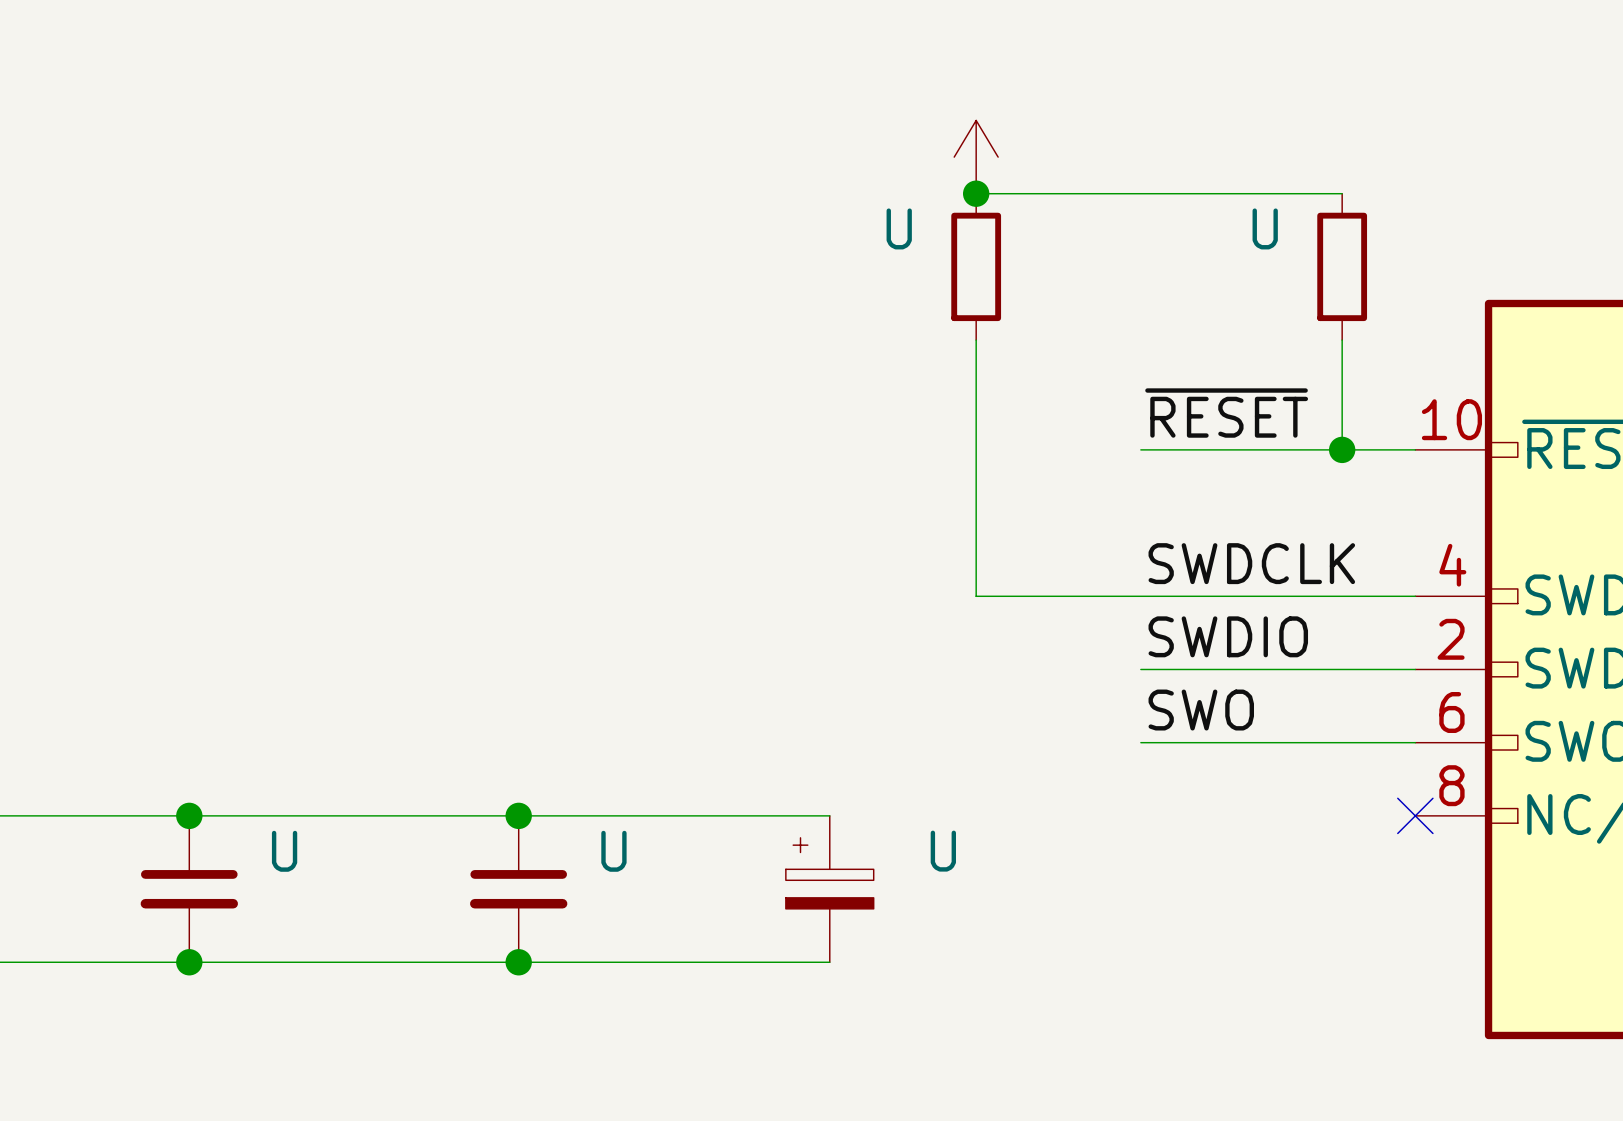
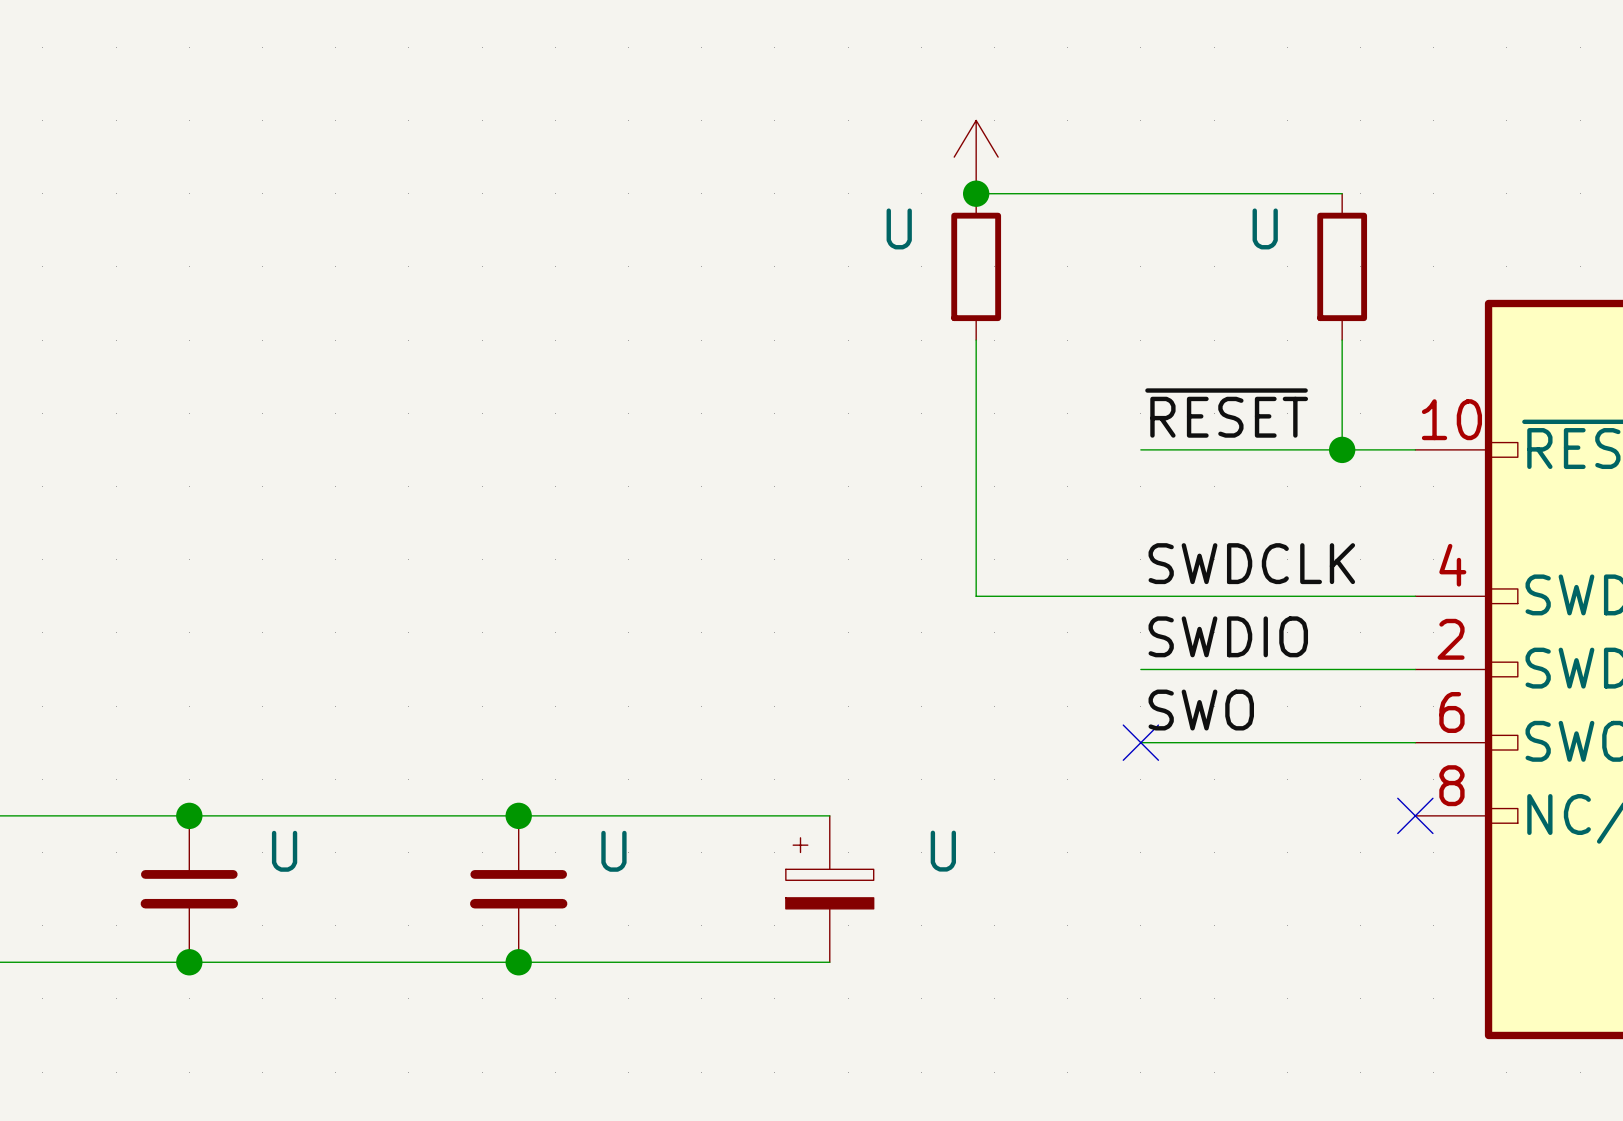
no-connect mark: none -> (1140, 742)

